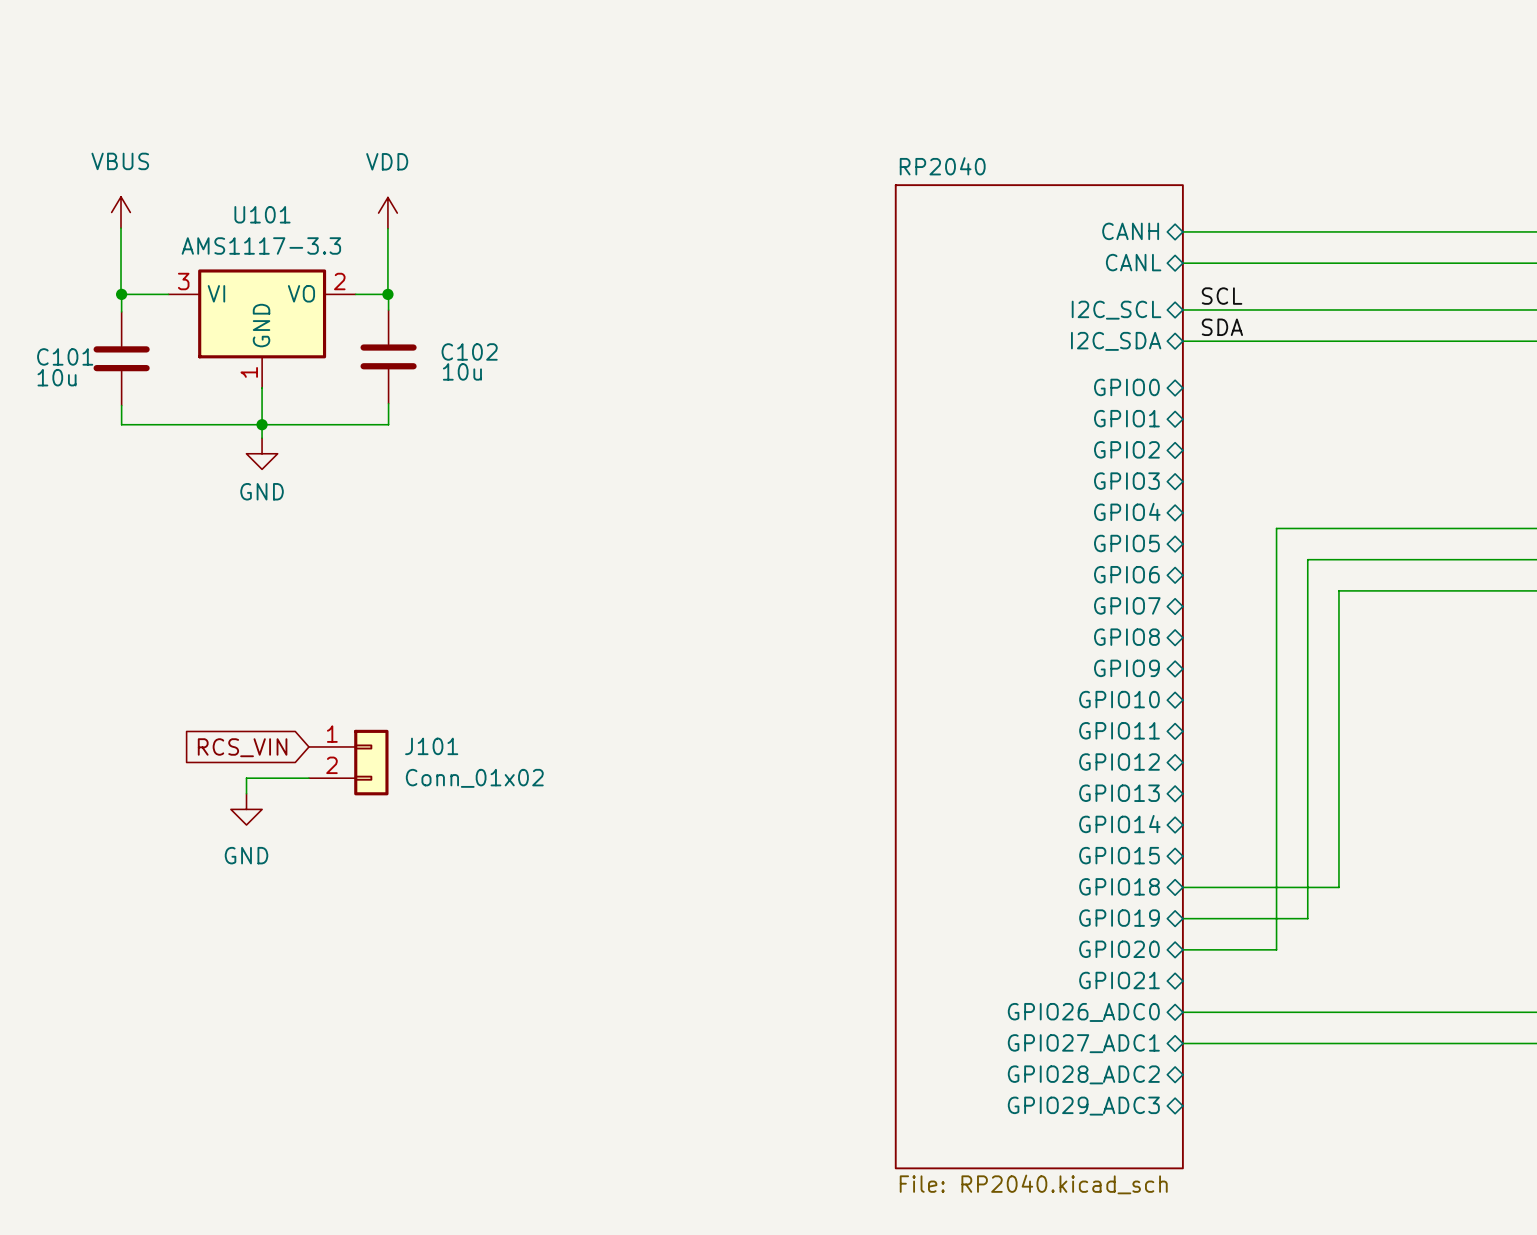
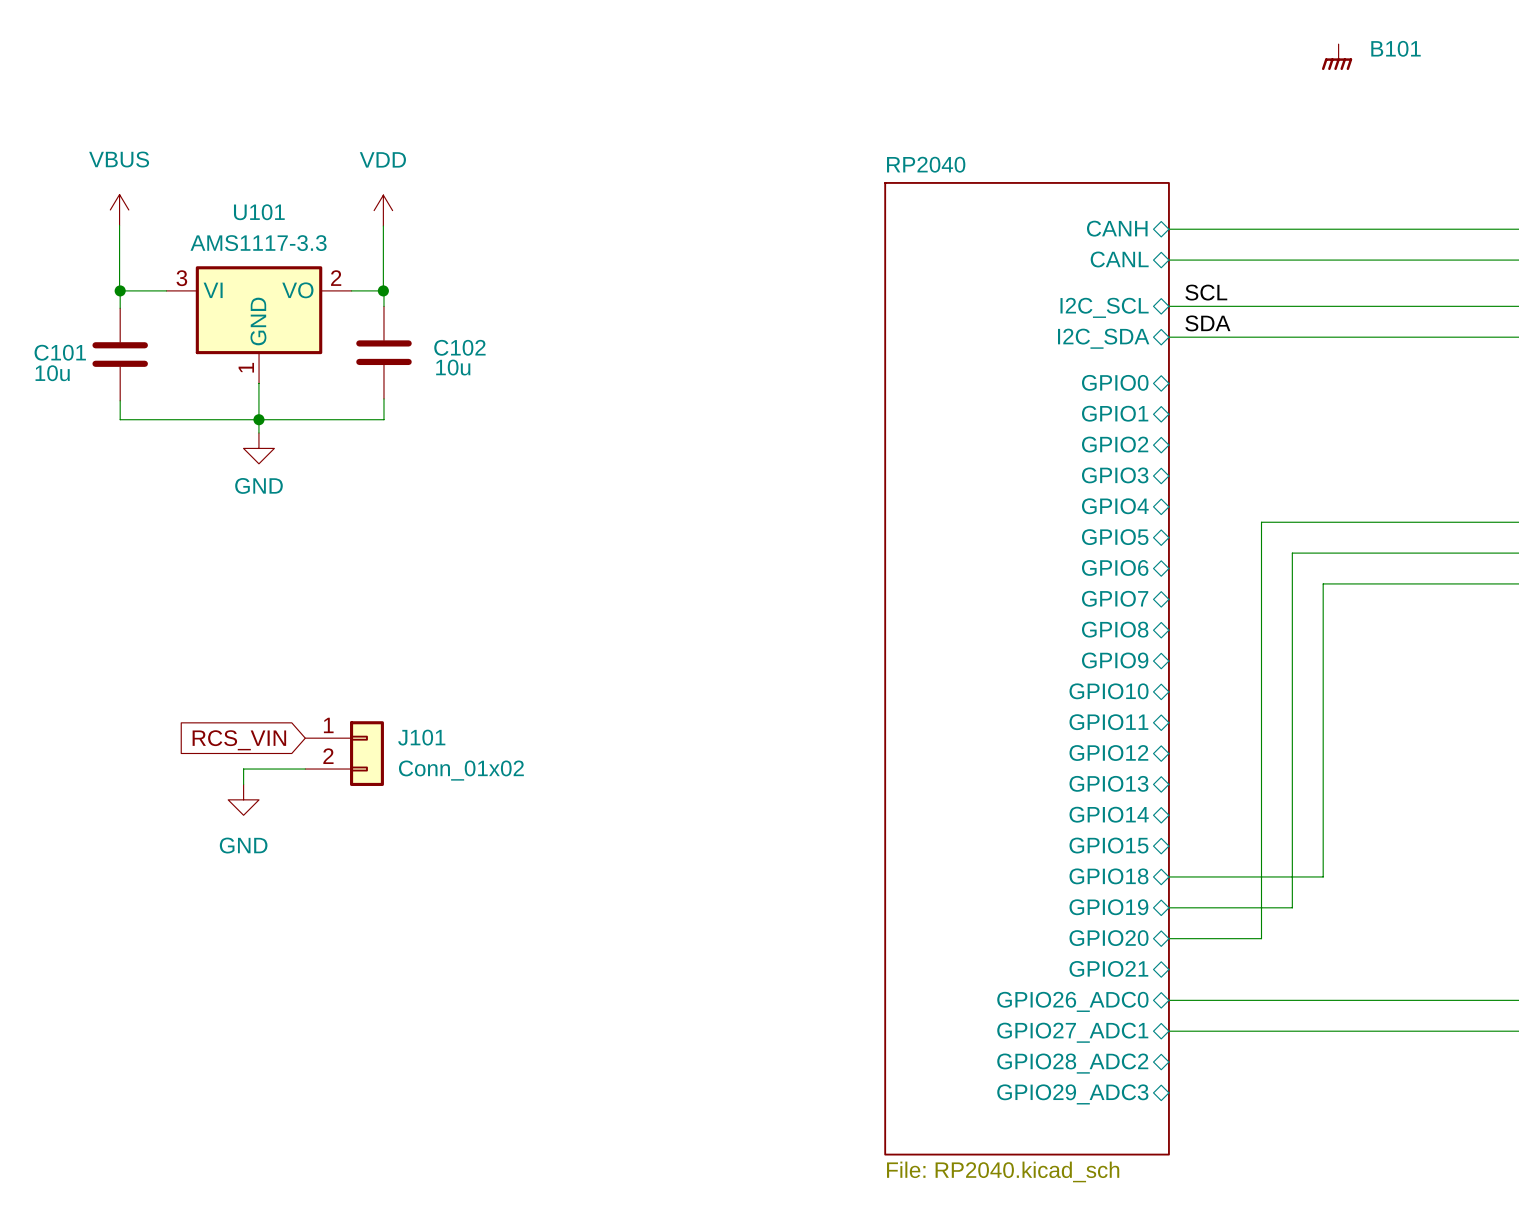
B101: none -> (1337, 57)

